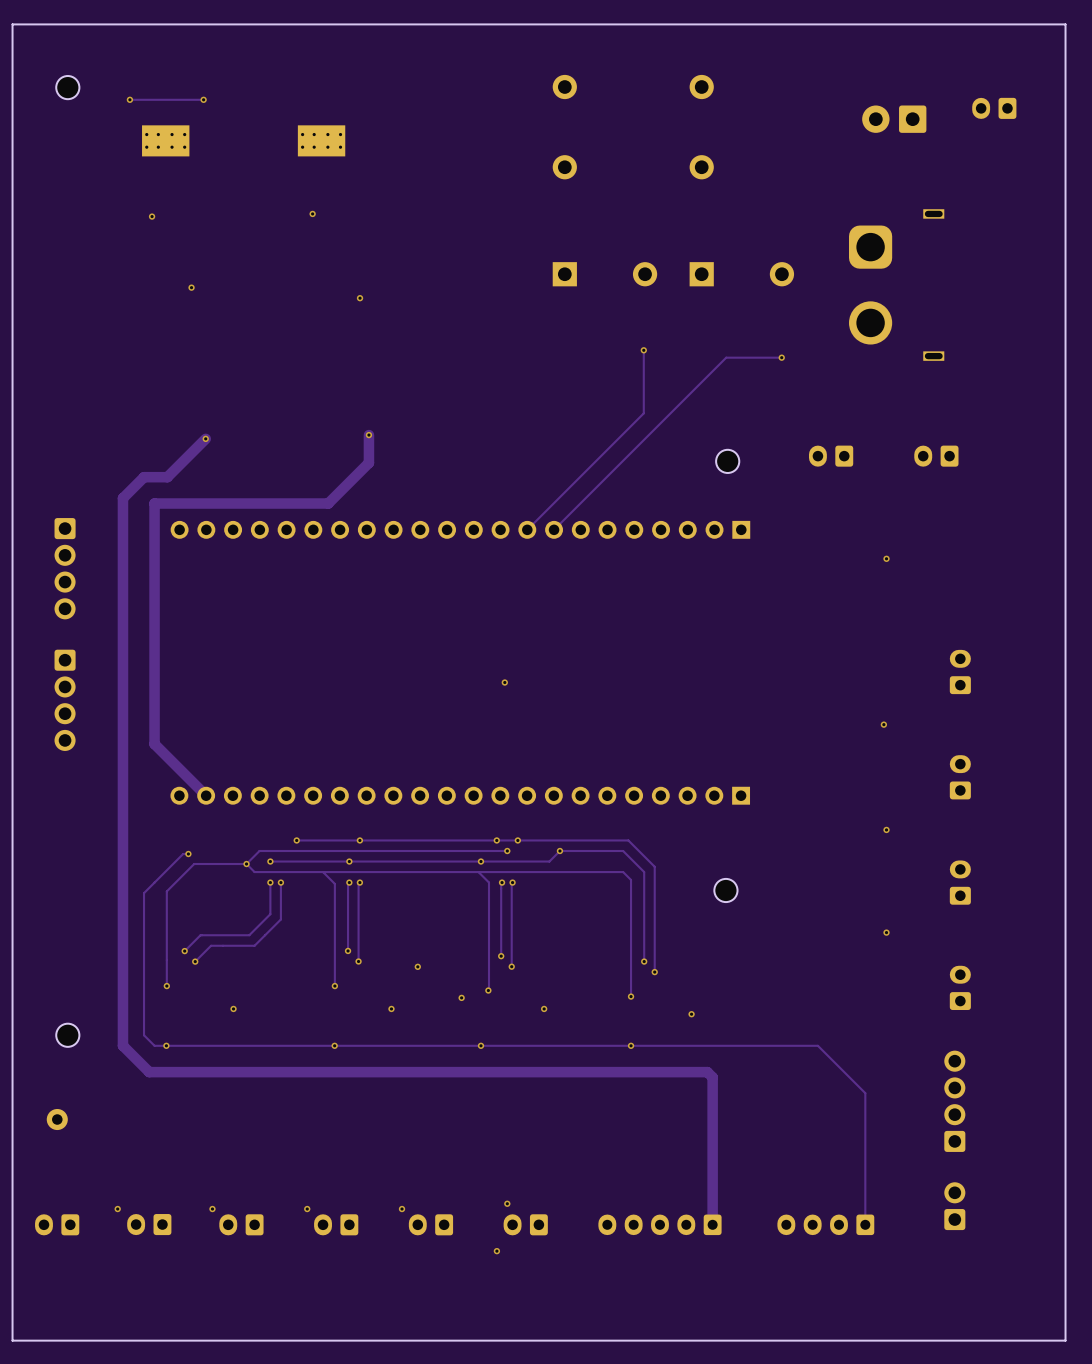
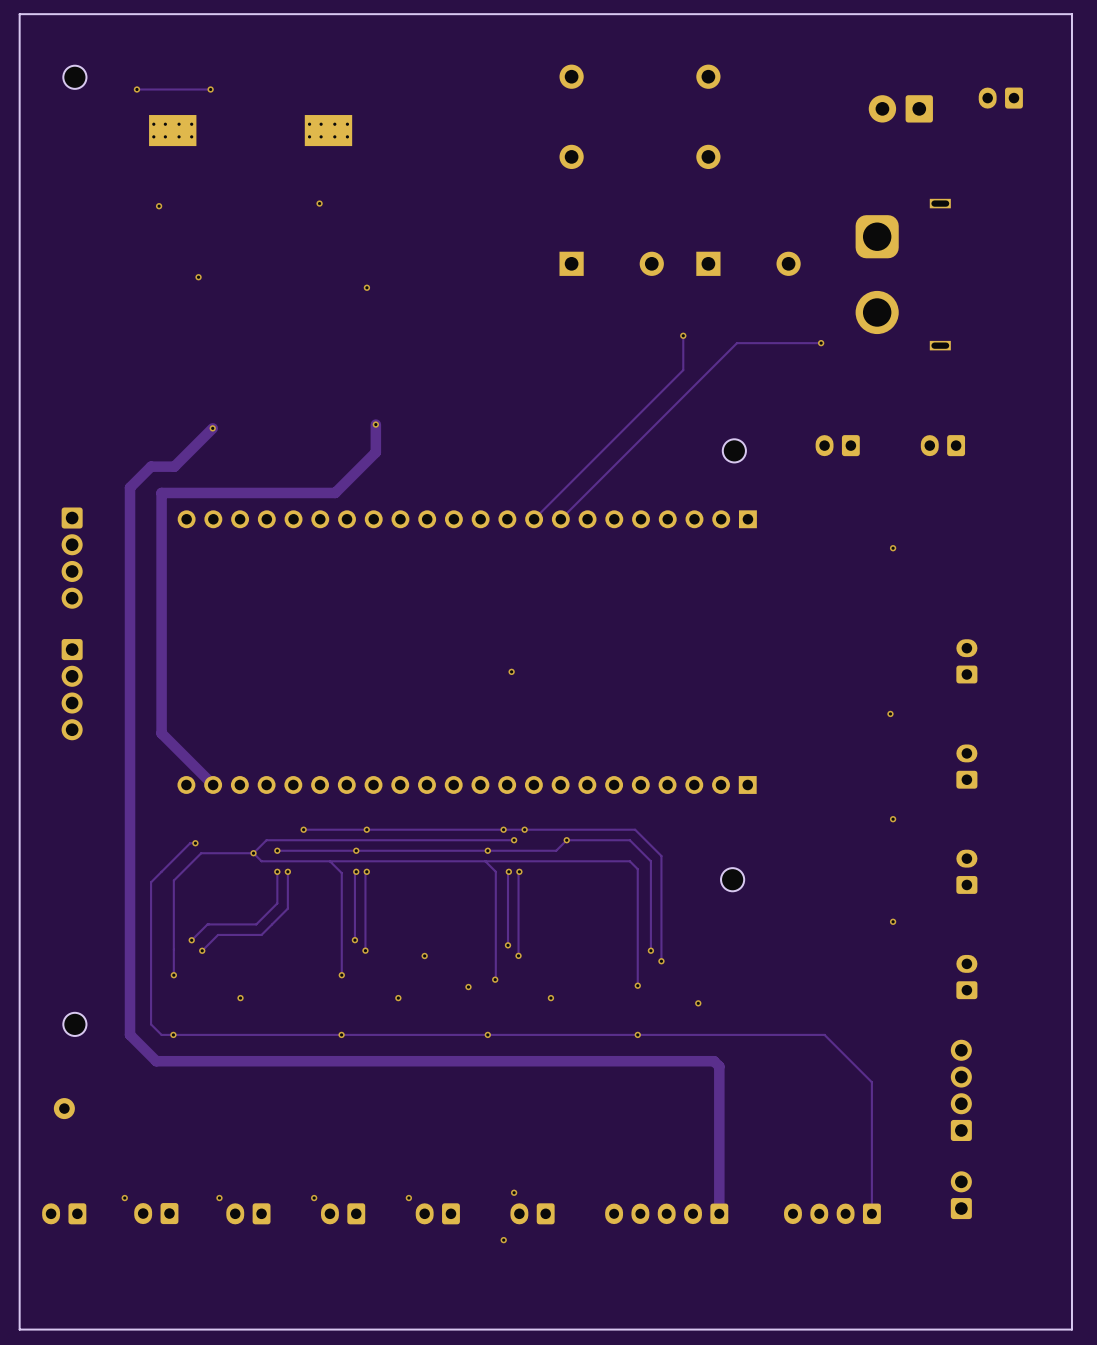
track: (643, 350) (643, 413) -> (683, 335) (683, 370) (650, 402)
via position: (643, 350) -> (683, 335)
track: (781, 357) (726, 357) -> (821, 343) (736, 343) (732, 347)
via position: (781, 357) -> (821, 343)

